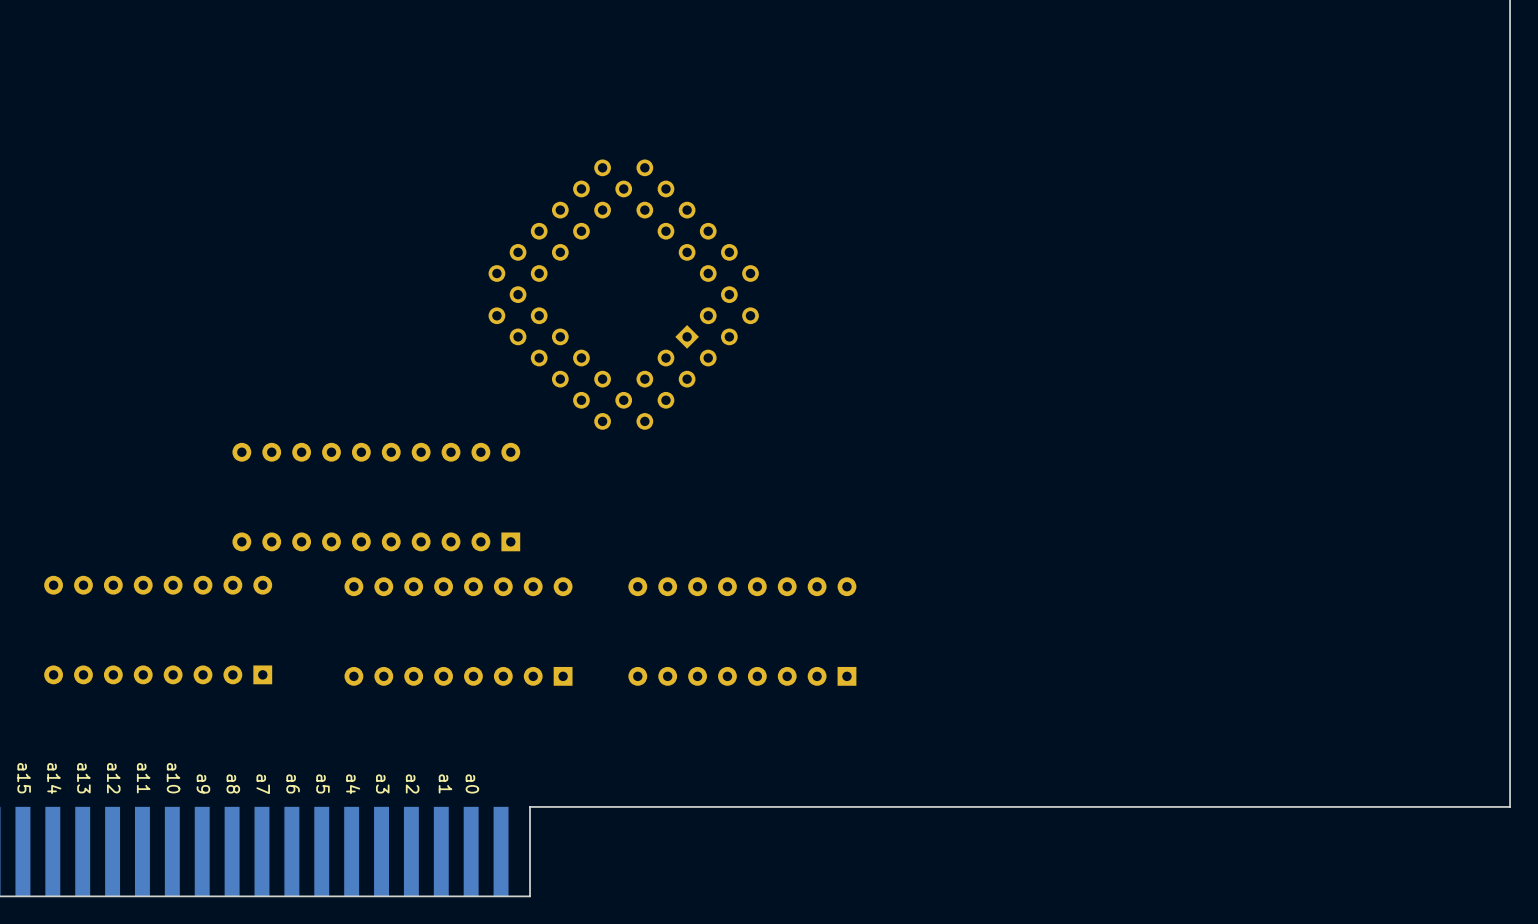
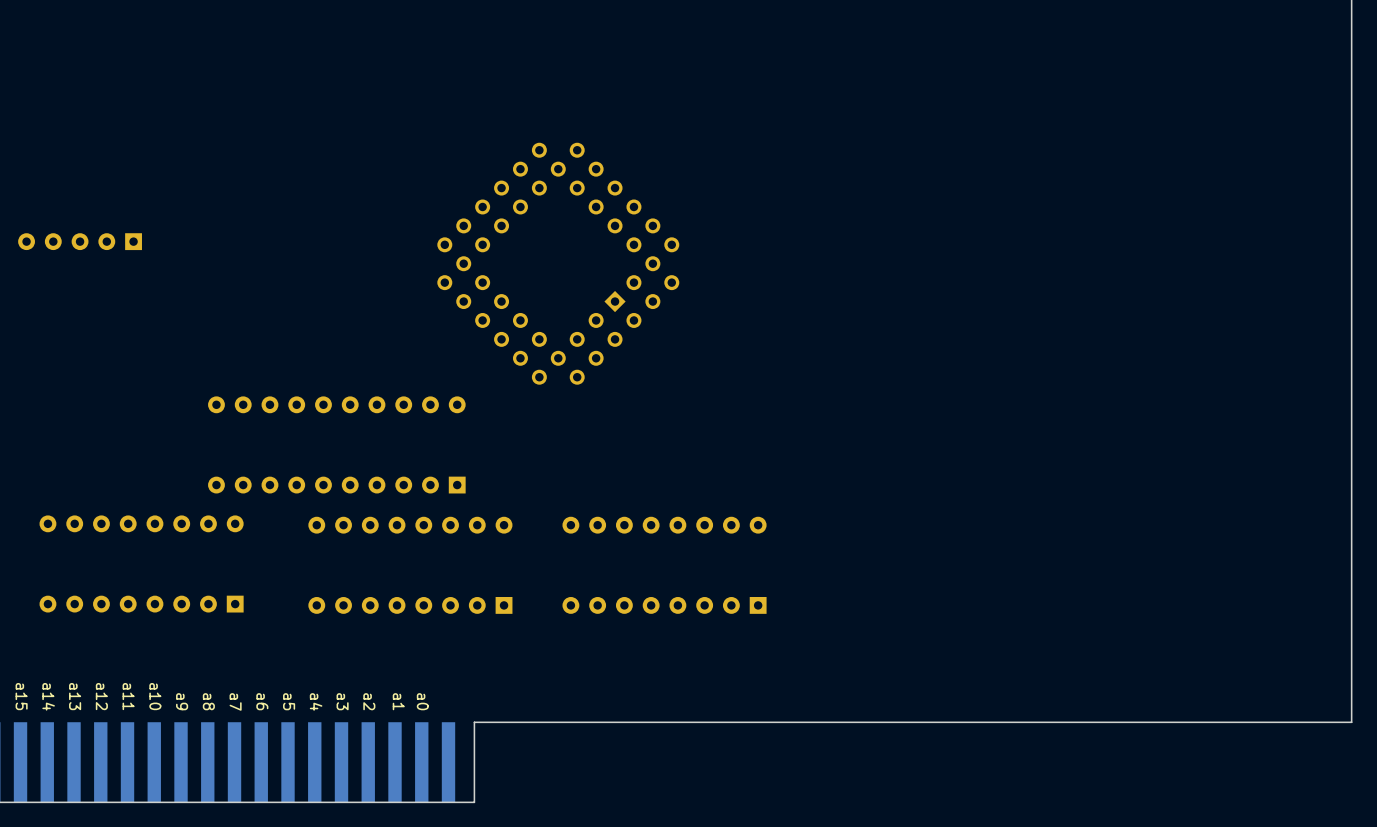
part: none -> (80, 241)

